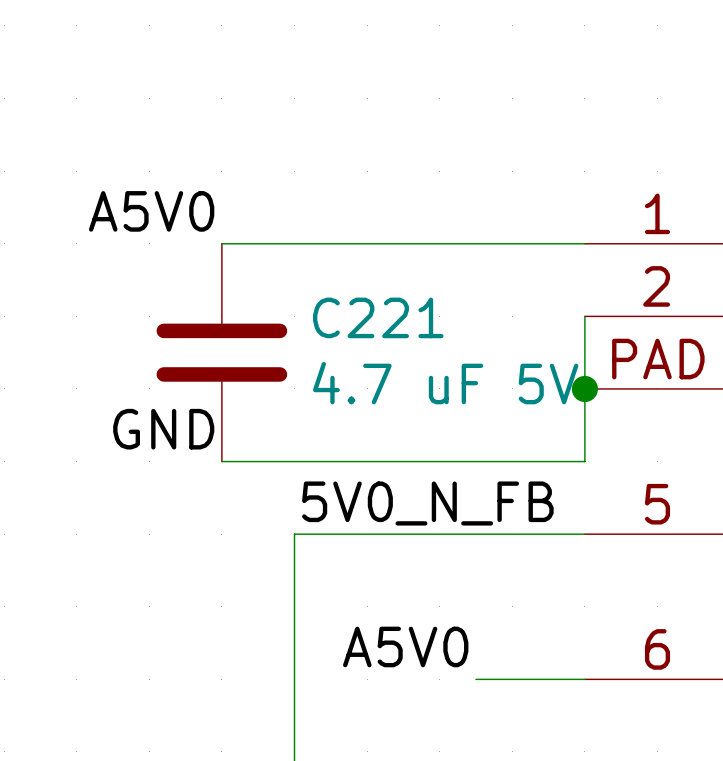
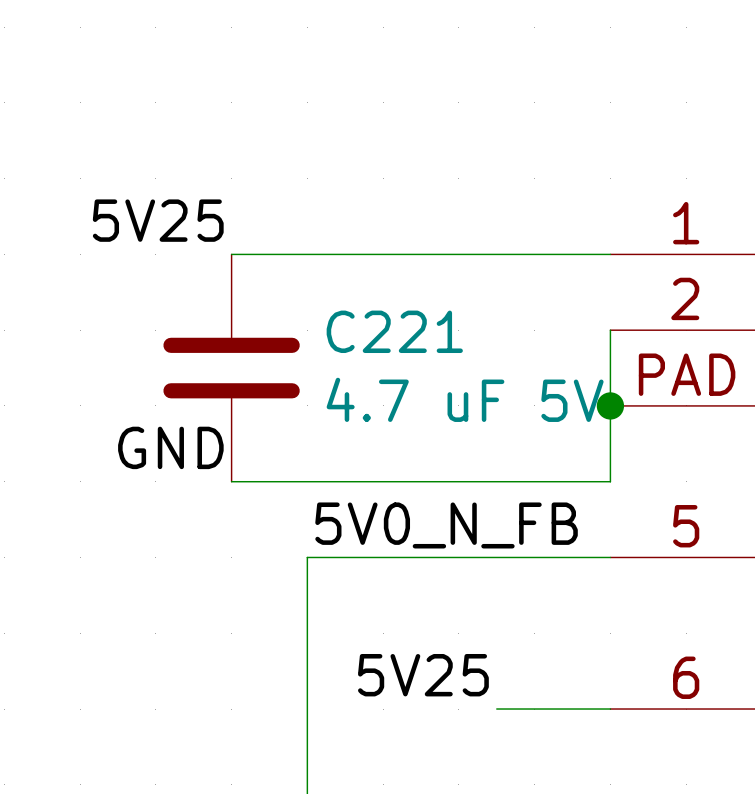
label: A5V0 (151, 211) -> 5V25 (158, 220)
label: A5V0 (405, 646) -> 5V25 (423, 675)

